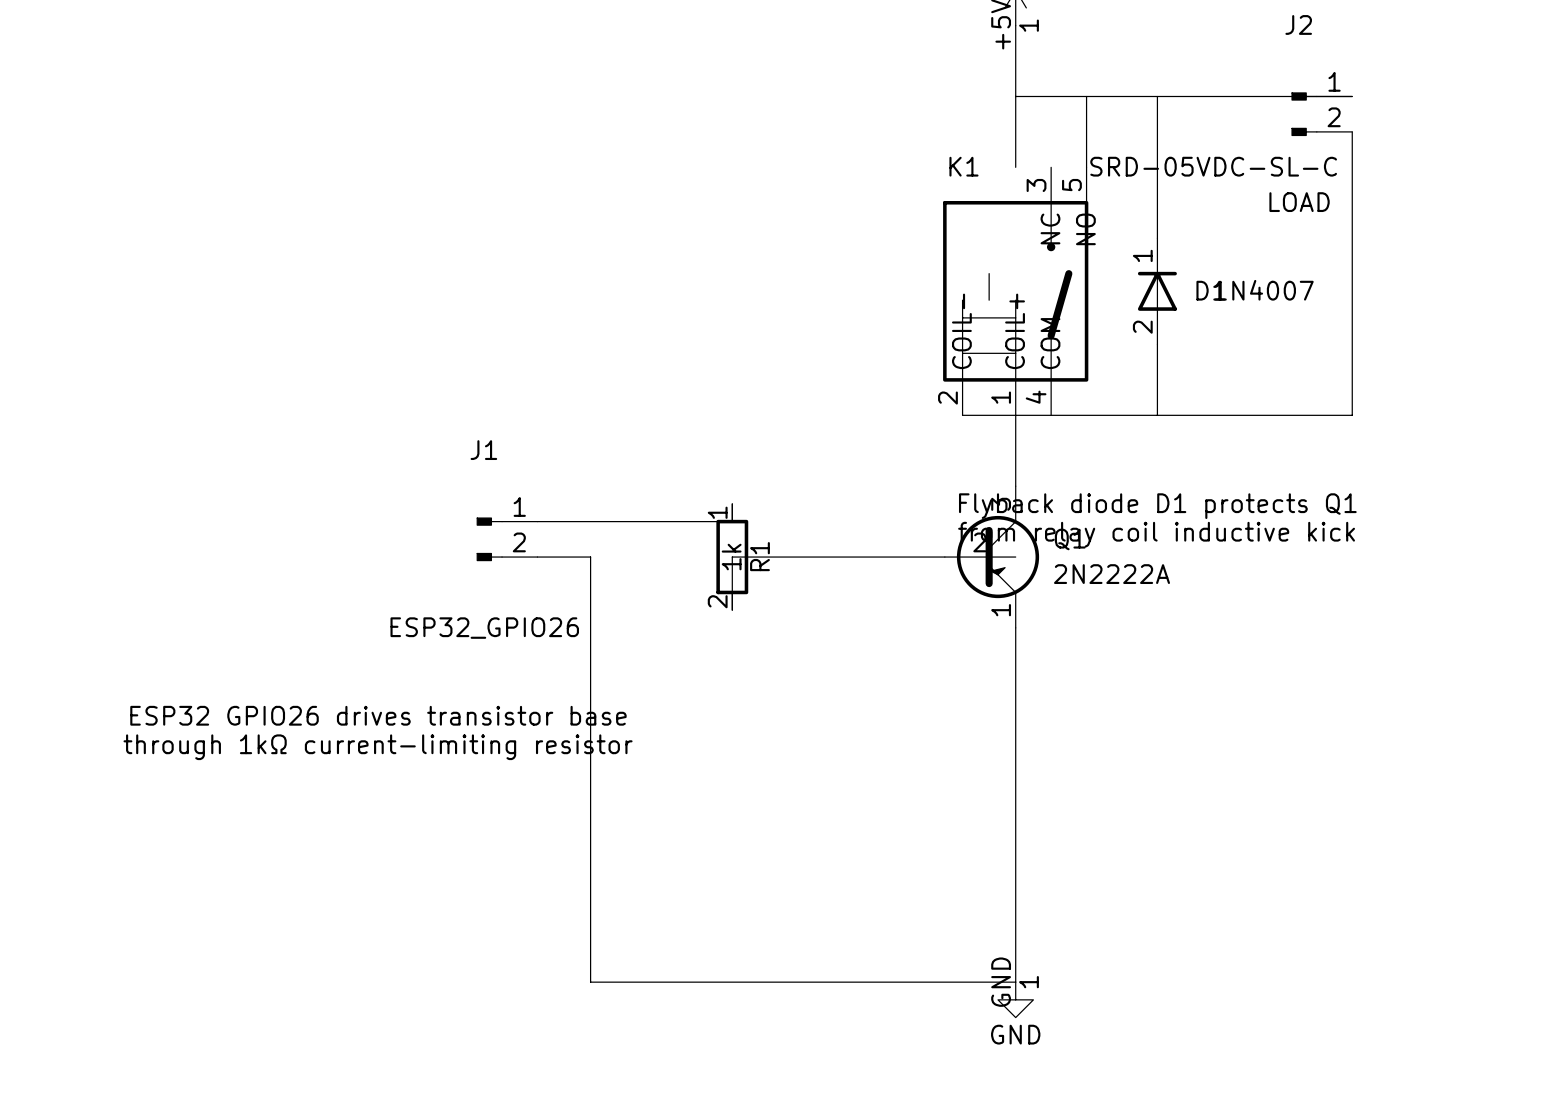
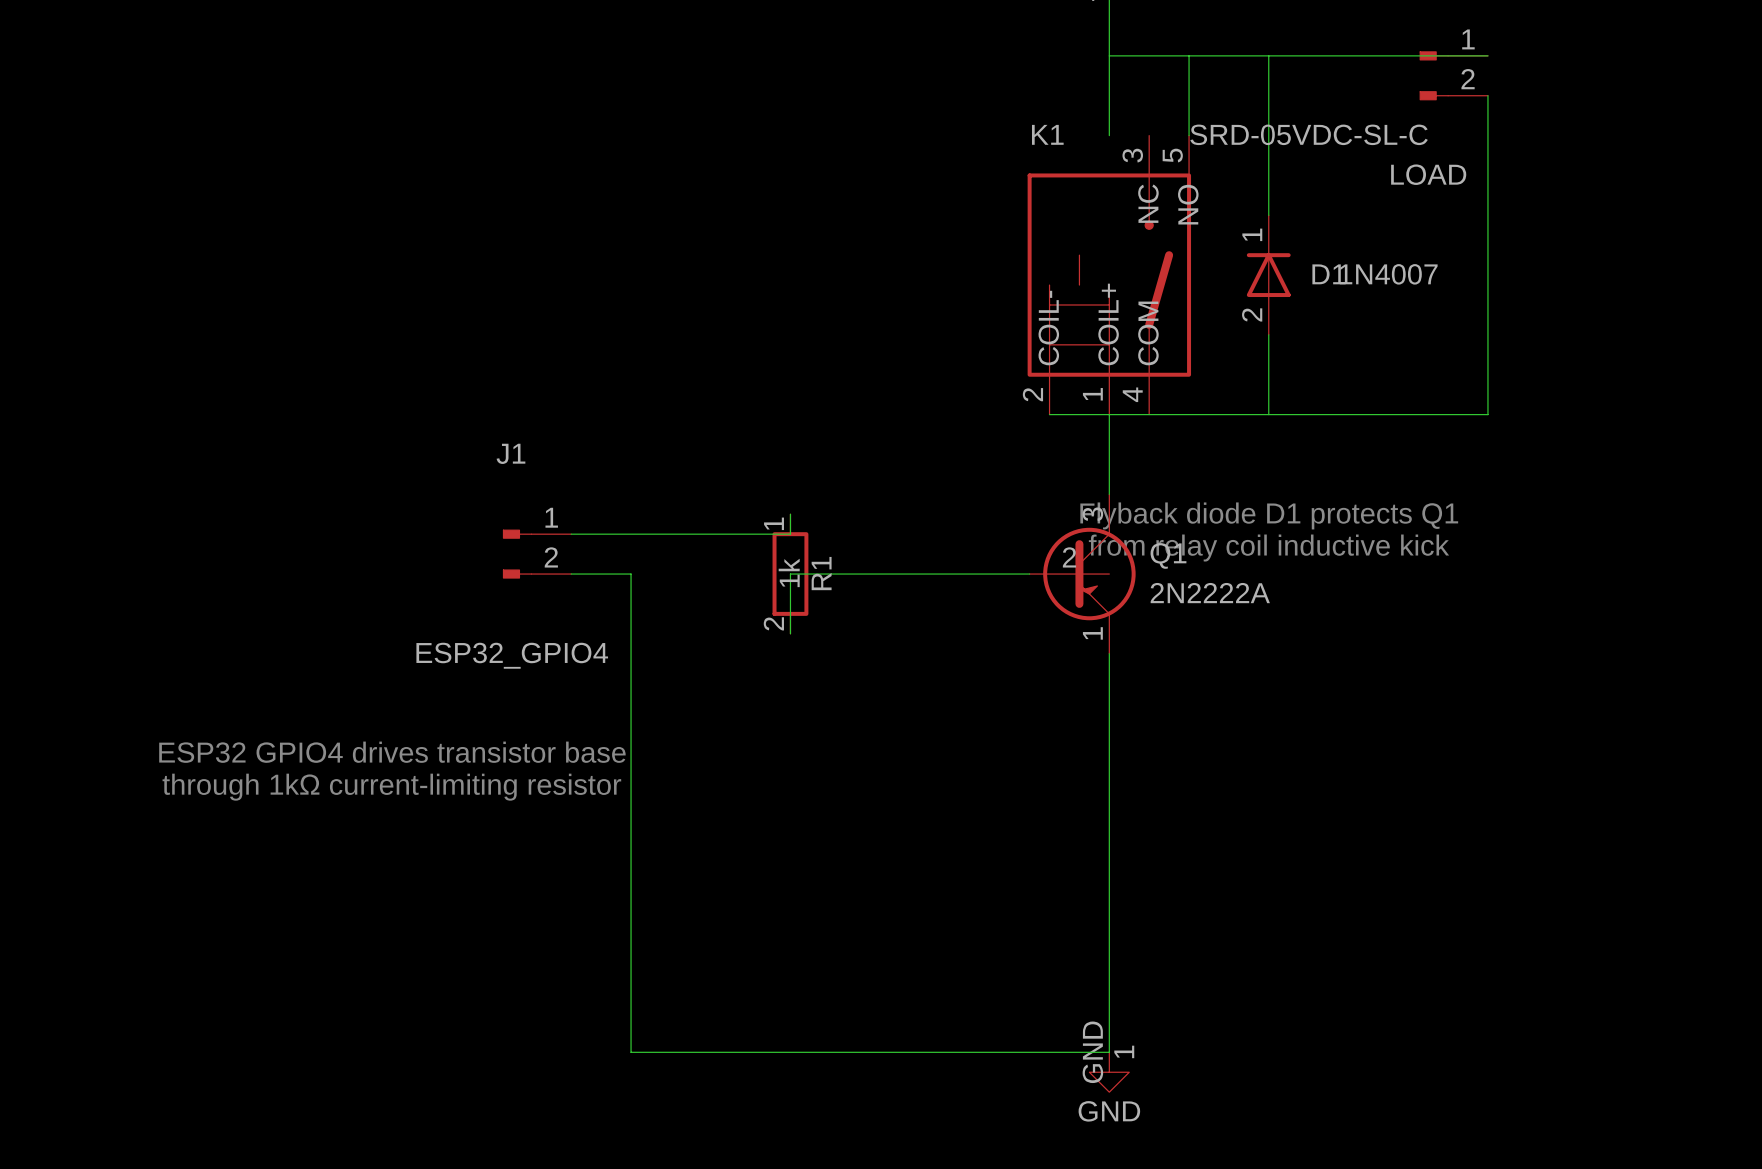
J1 value: ESP32_GPIO26 (484, 628) -> ESP32_GPIO4 (512, 655)
text: ESP32 GPIO26 drives transistor base (378, 715) -> ESP32 GPIO4 drives transistor base (392, 752)

